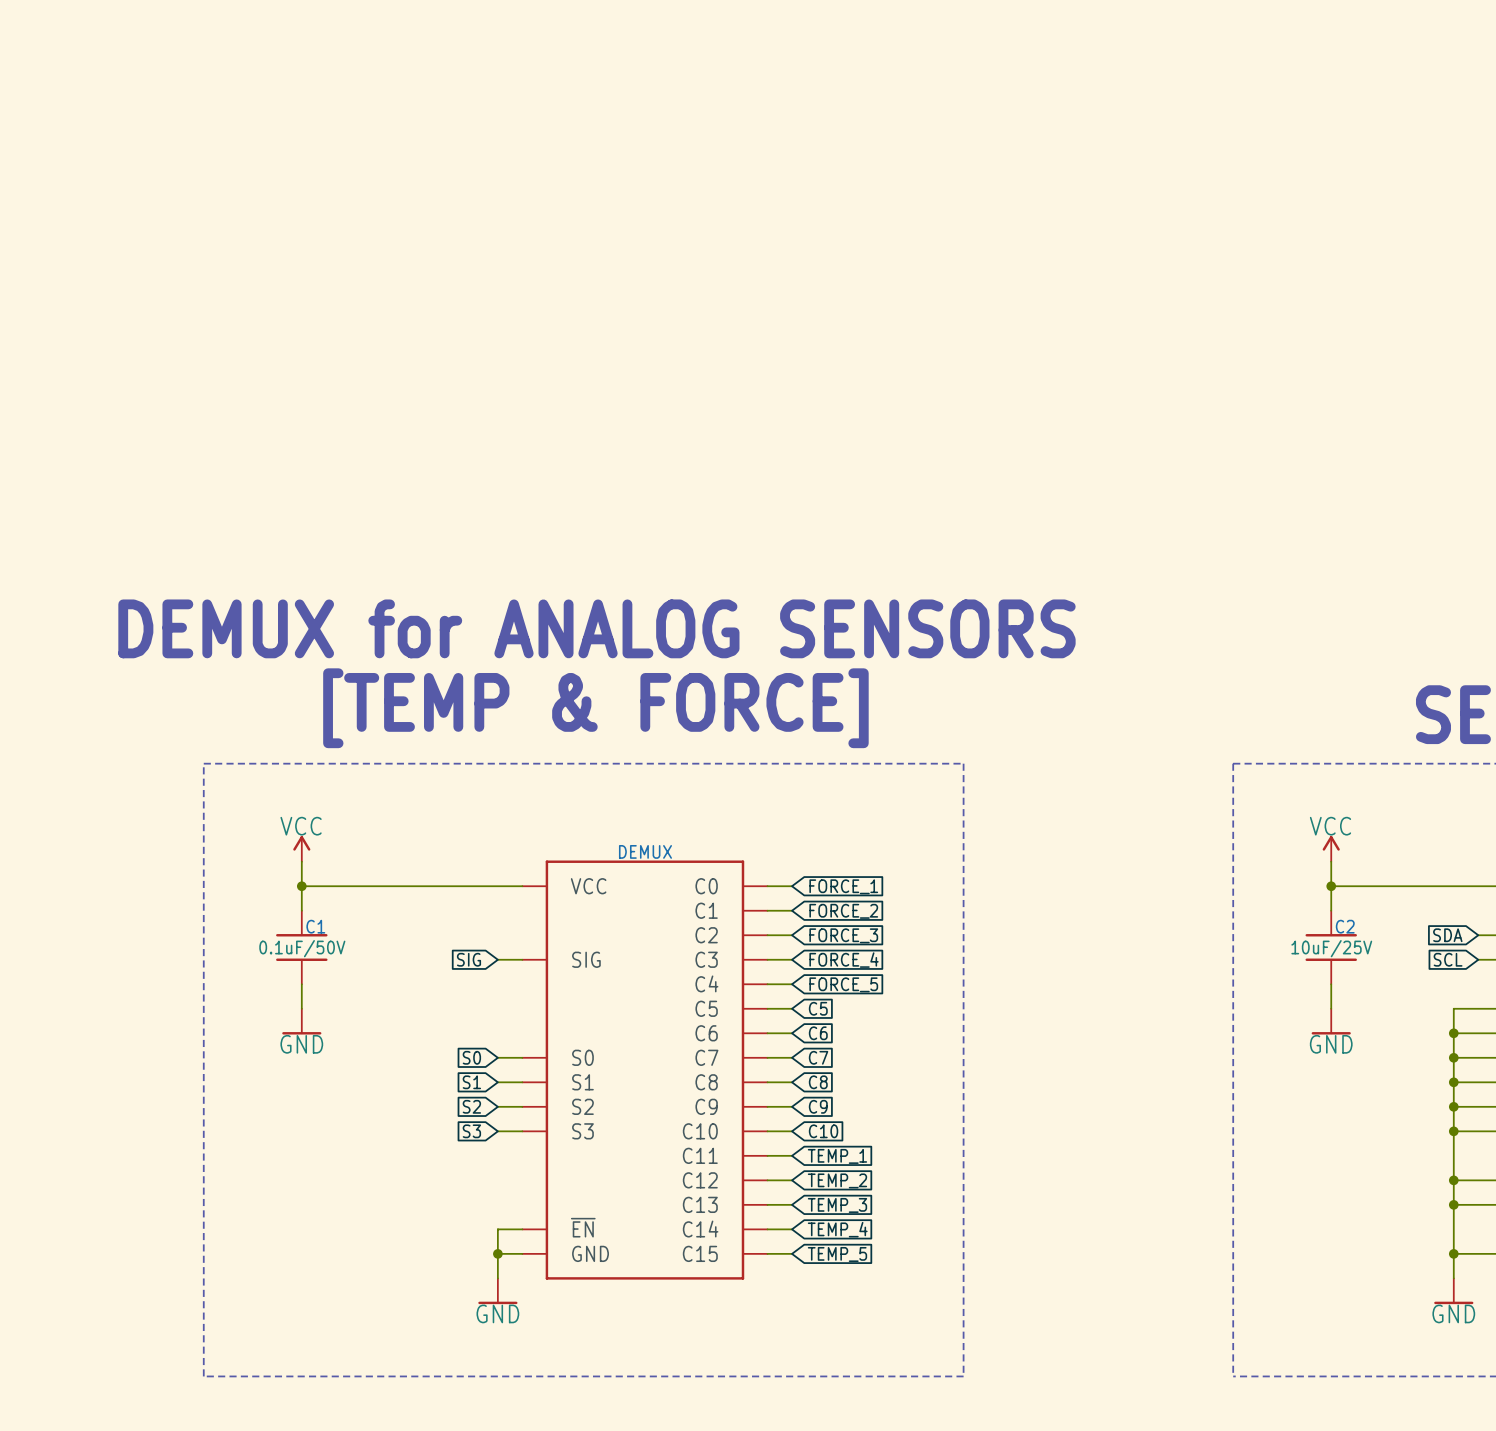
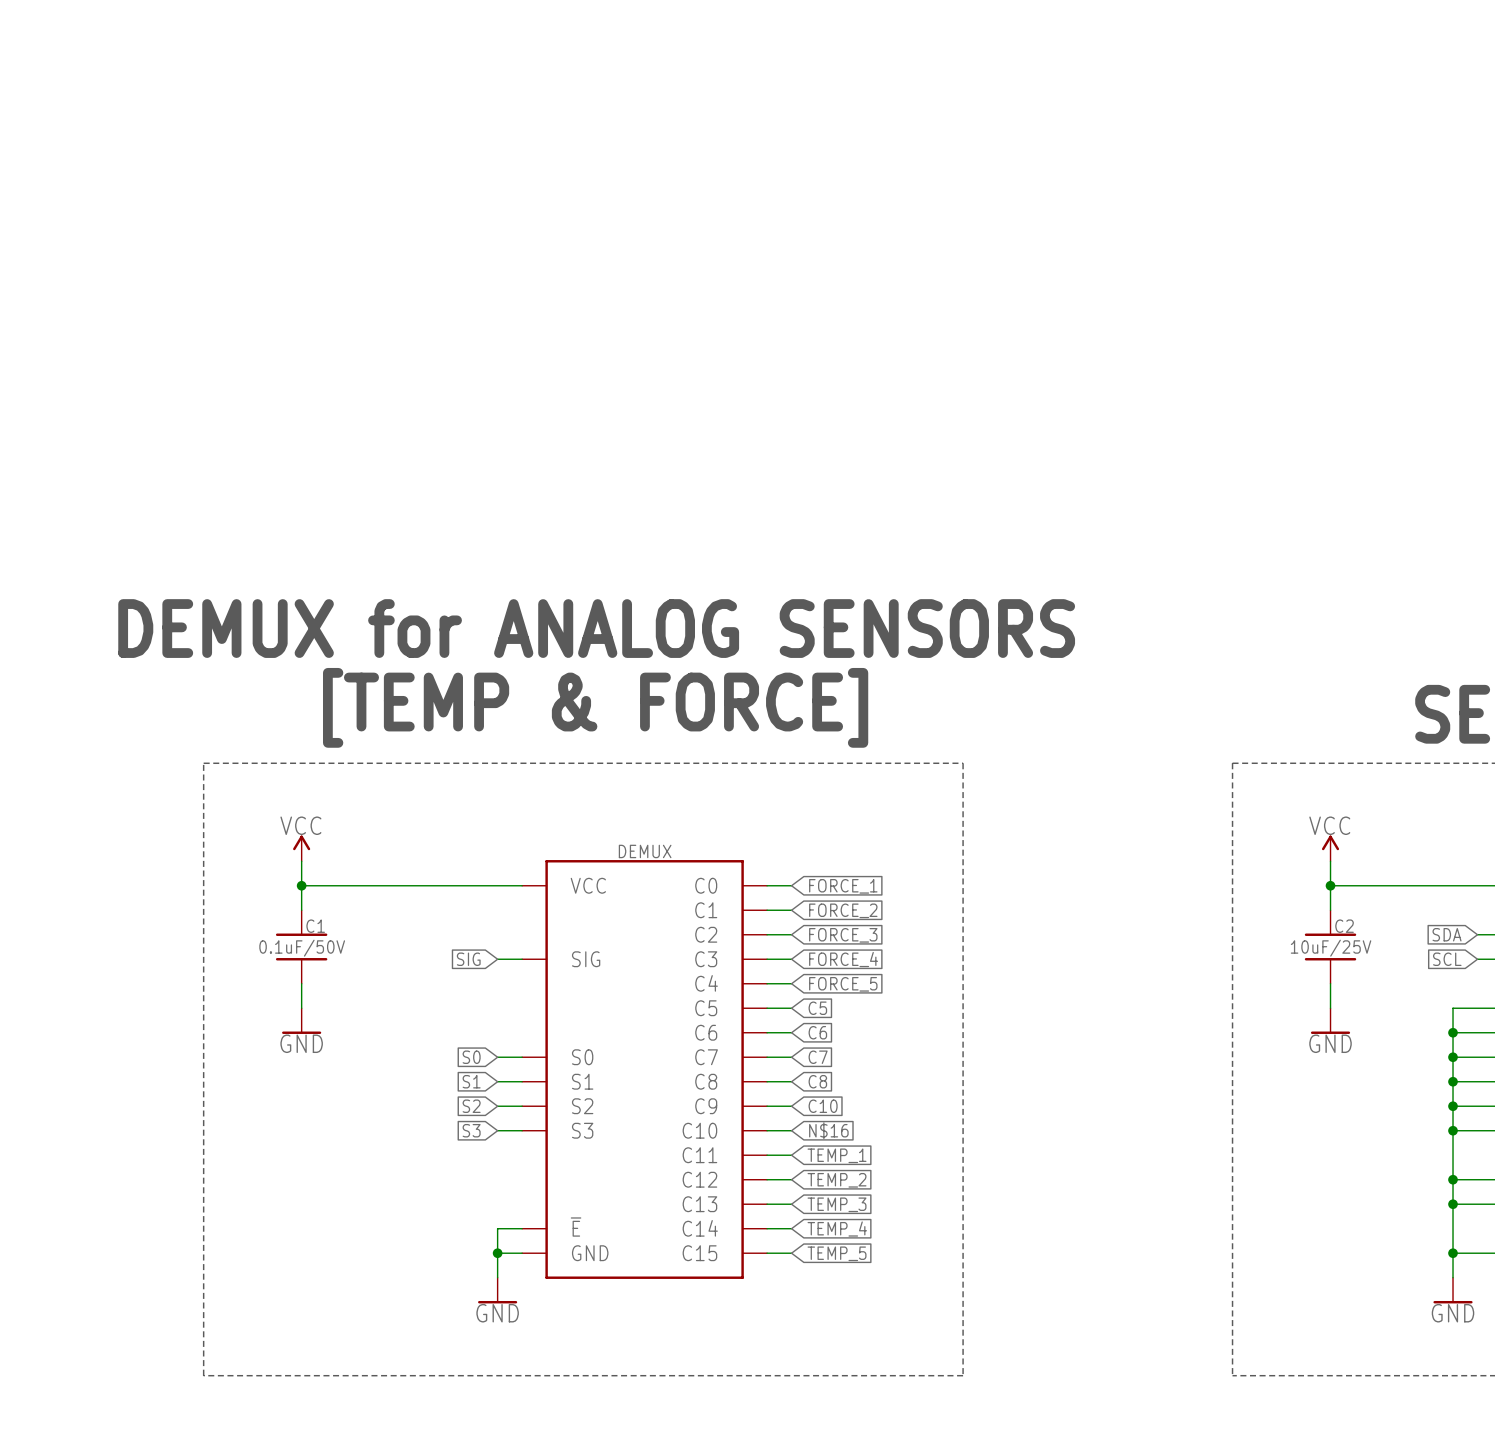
global label: C9 (818, 1106) -> C10 (823, 1106)
global label: C10 (823, 1131) -> N$16 (828, 1130)
DEMUX pin name: ~{EN} (583, 1227) -> ~{E} (576, 1227)

